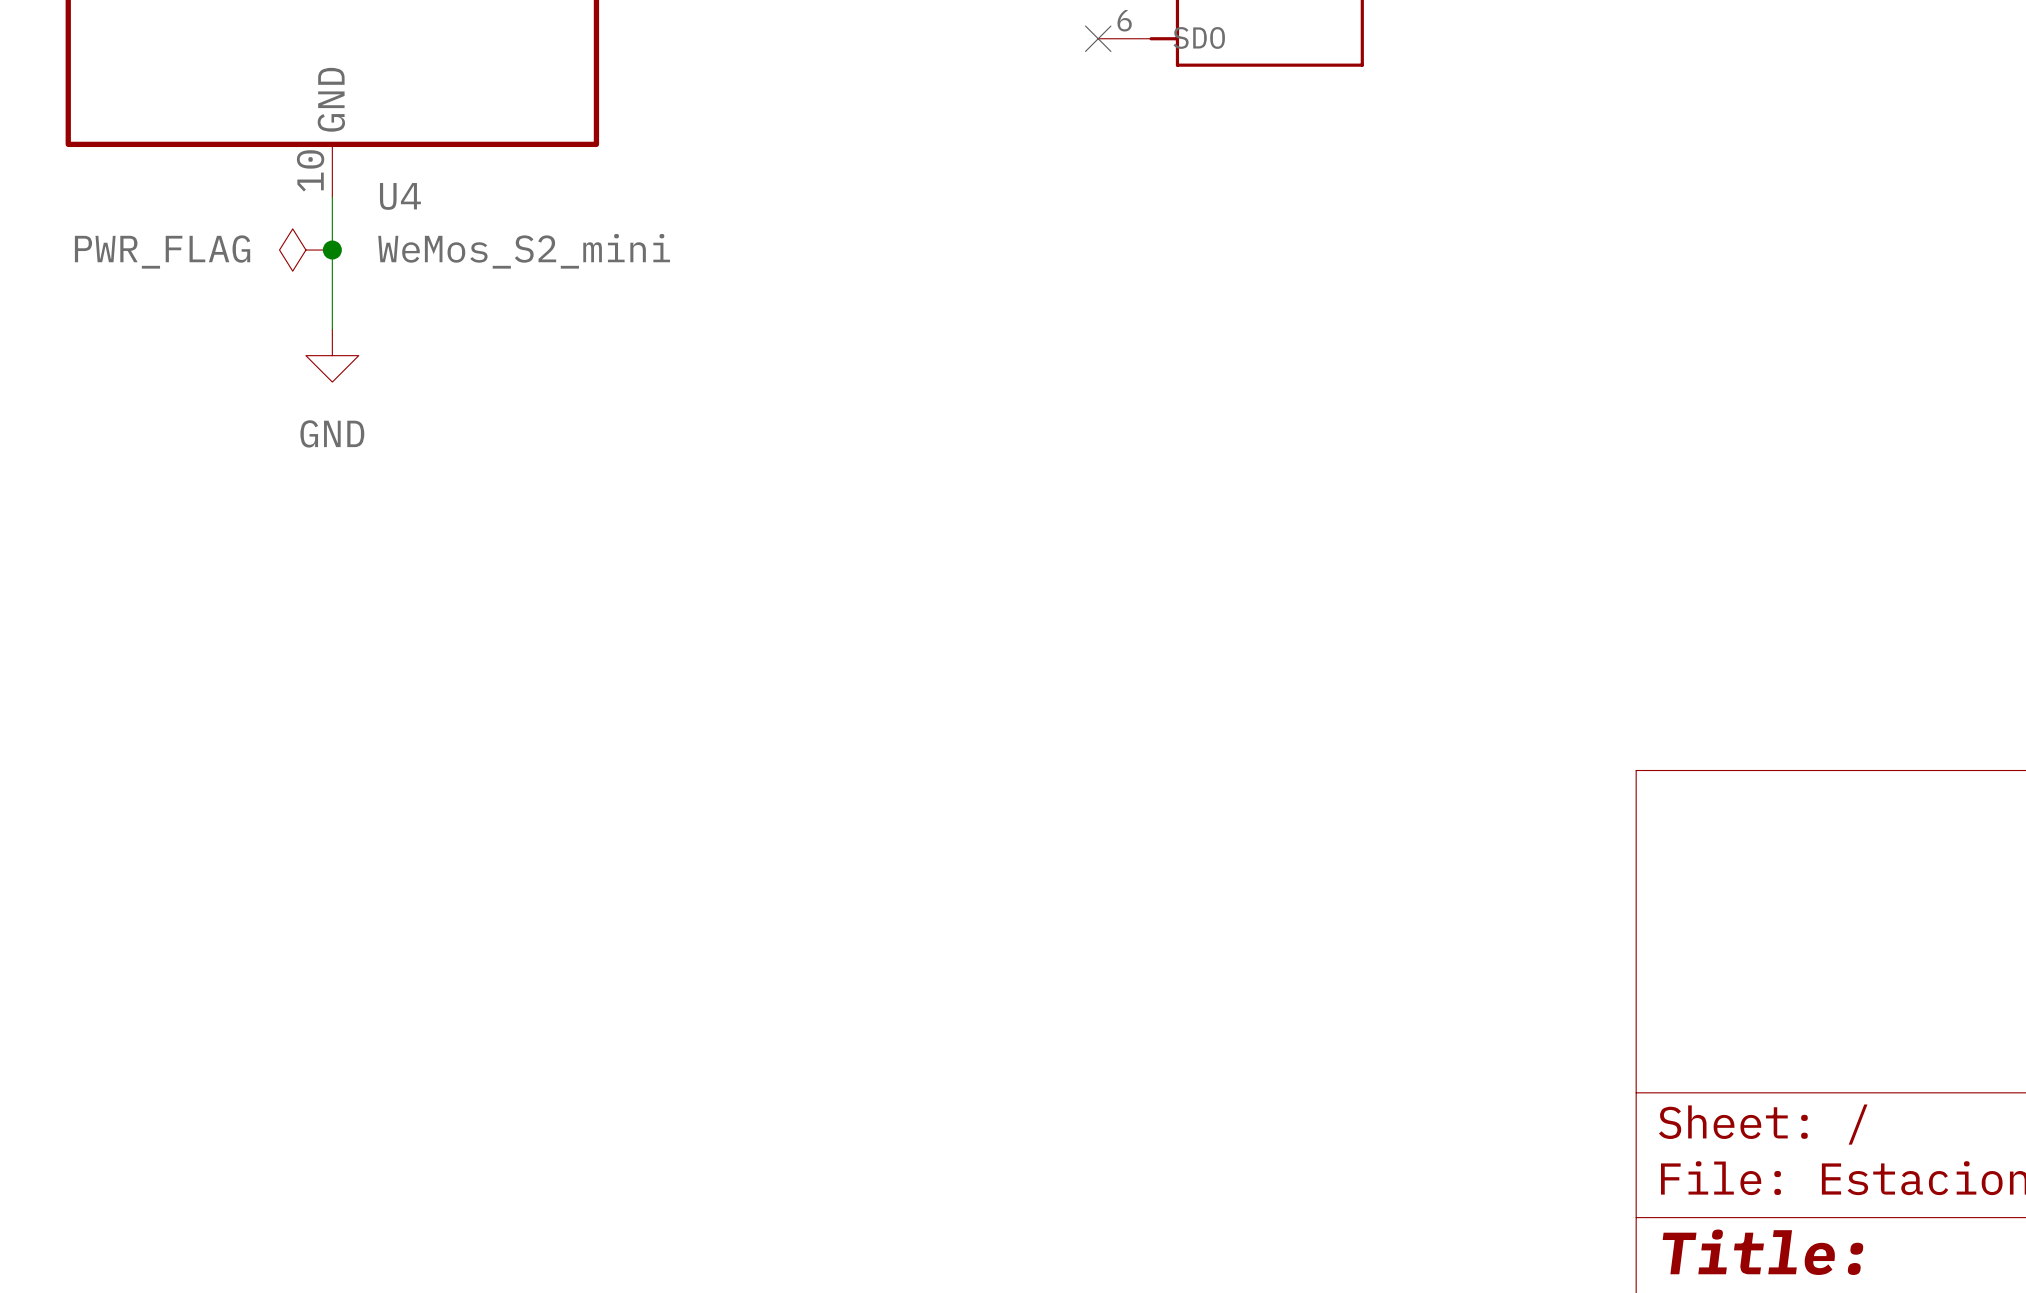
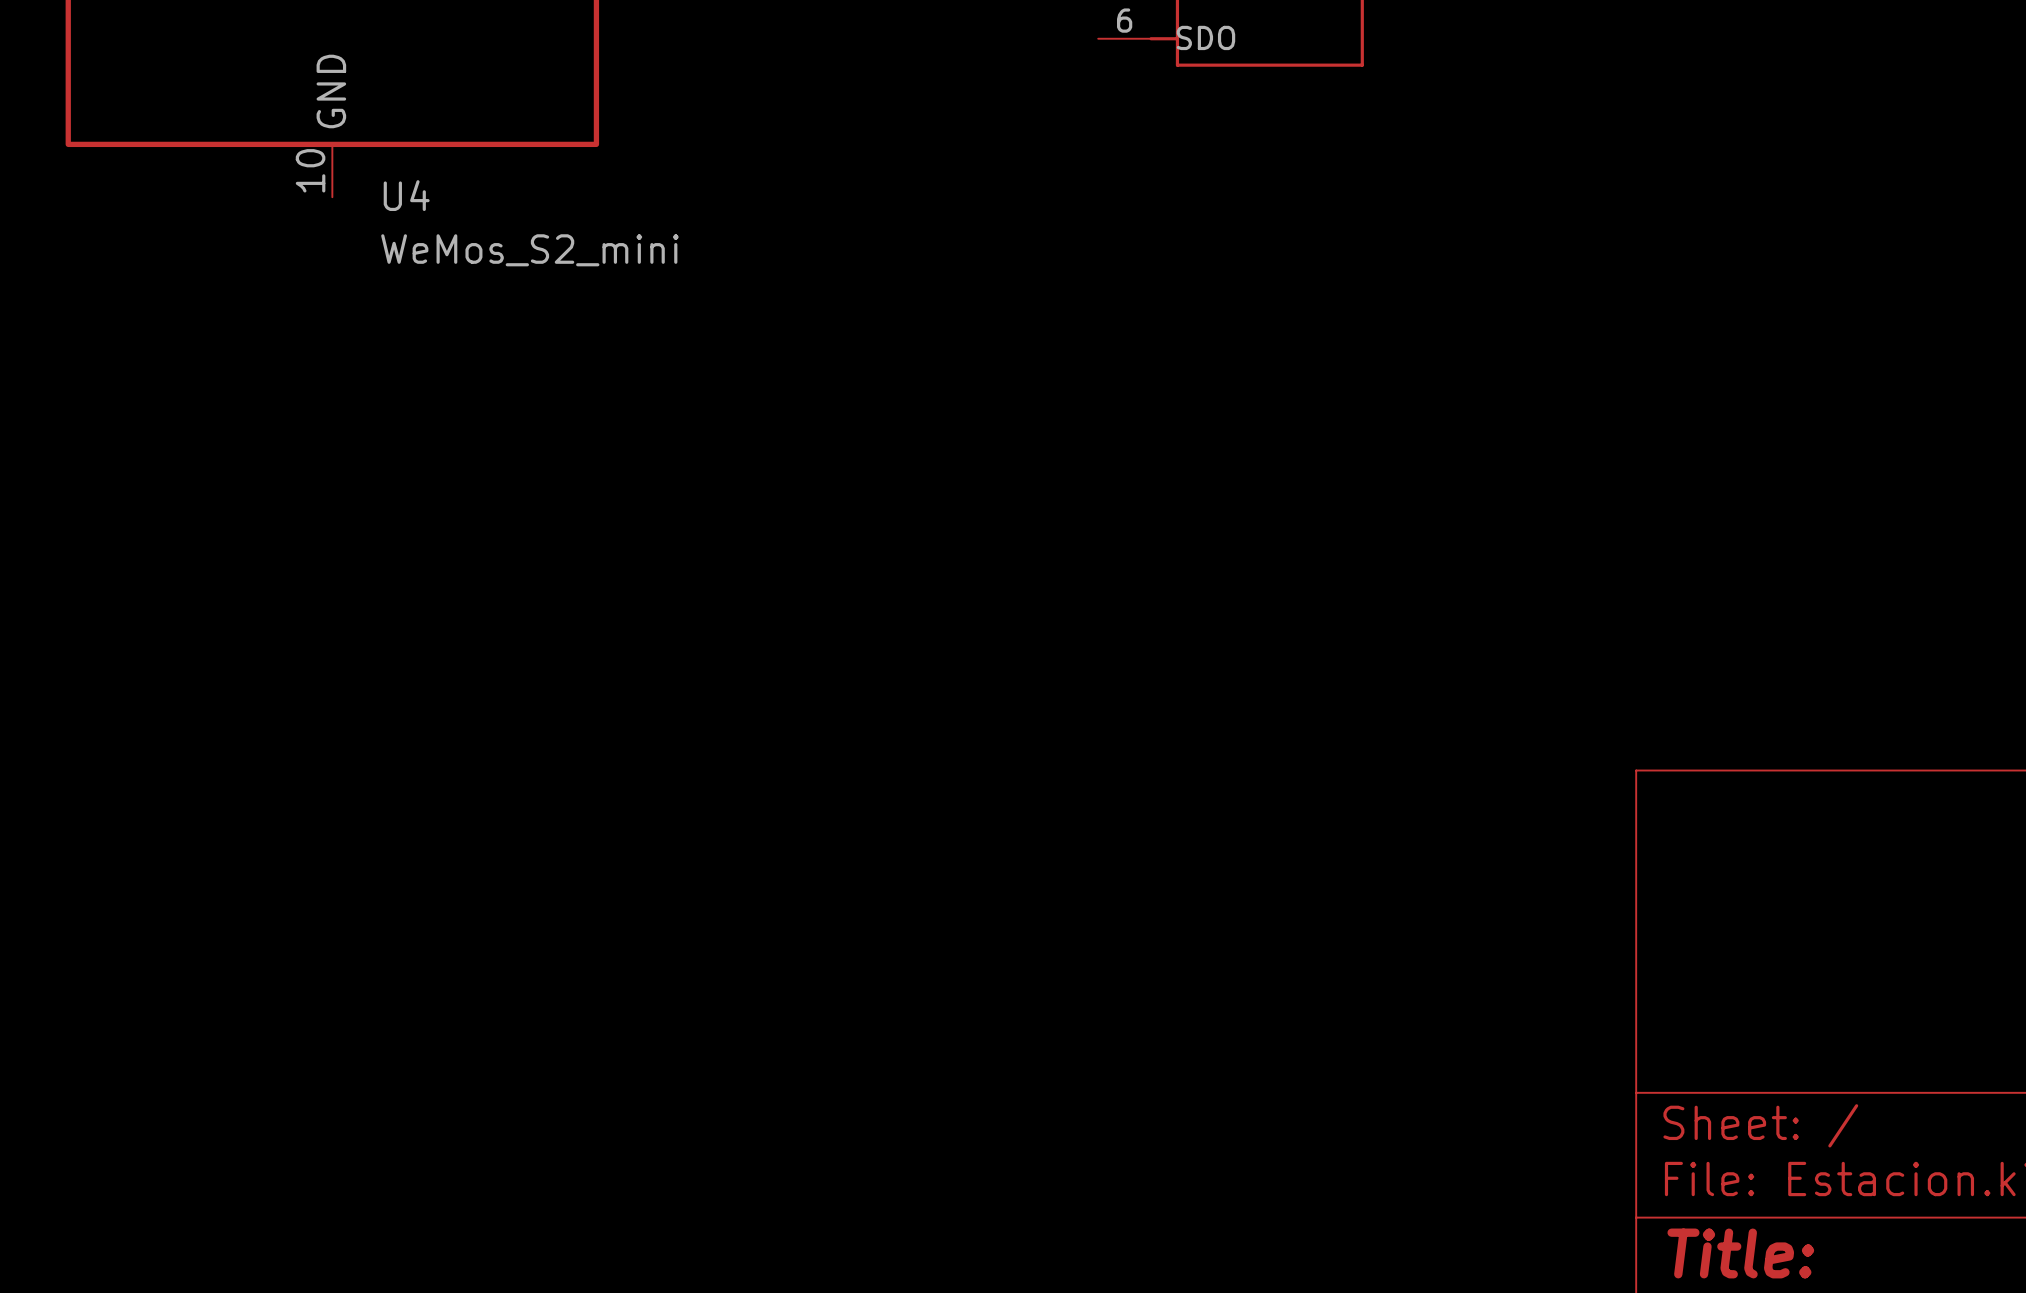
no-connect mark: (1098, 38) -> none
wire: (332, 197) (332, 329) -> none
power symbol: PWR_FLAG (305, 250) -> none
junction: (332, 250) -> none
power symbol: GND (332, 355) -> none

